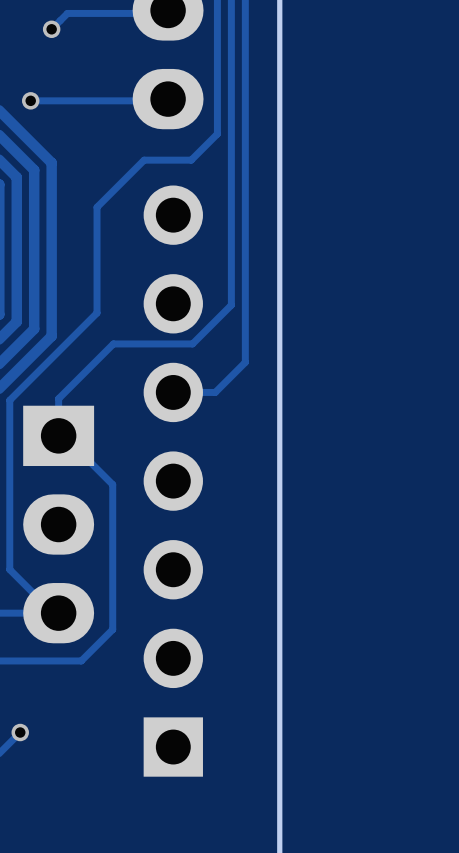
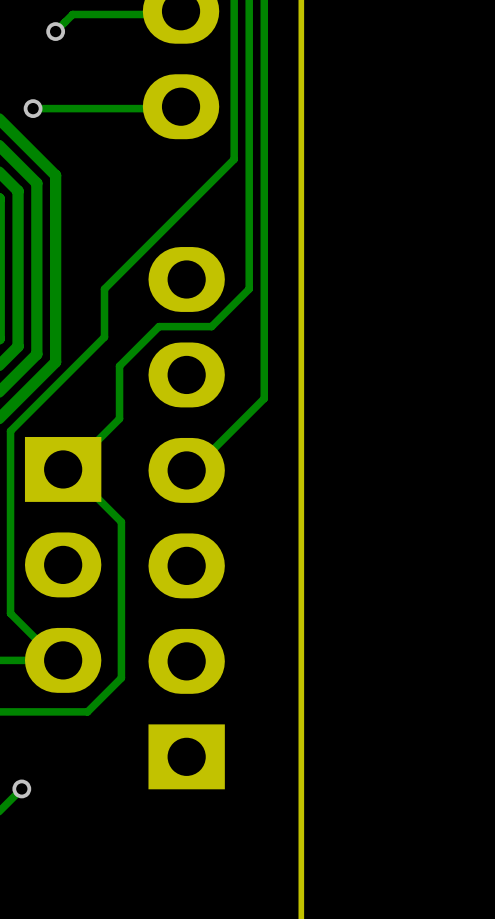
track: (217, 133) (191, 160) (144, 160) (97, 207) (97, 268) -> (234, 144) (234, 159) (104, 289)
part footprint: [143, 185, 203, 777] -> [148, 247, 225, 790]
track: (231, 268) (231, 305) (192, 343) (113, 343) (58, 398) (58, 435) -> (249, 289) (211, 326)
track: none -> (159, 326) (119, 366) (119, 418) (68, 469)
track: (245, 362) (215, 392) (173, 392) -> (264, 390) (264, 398) (192, 470) (186, 470)

